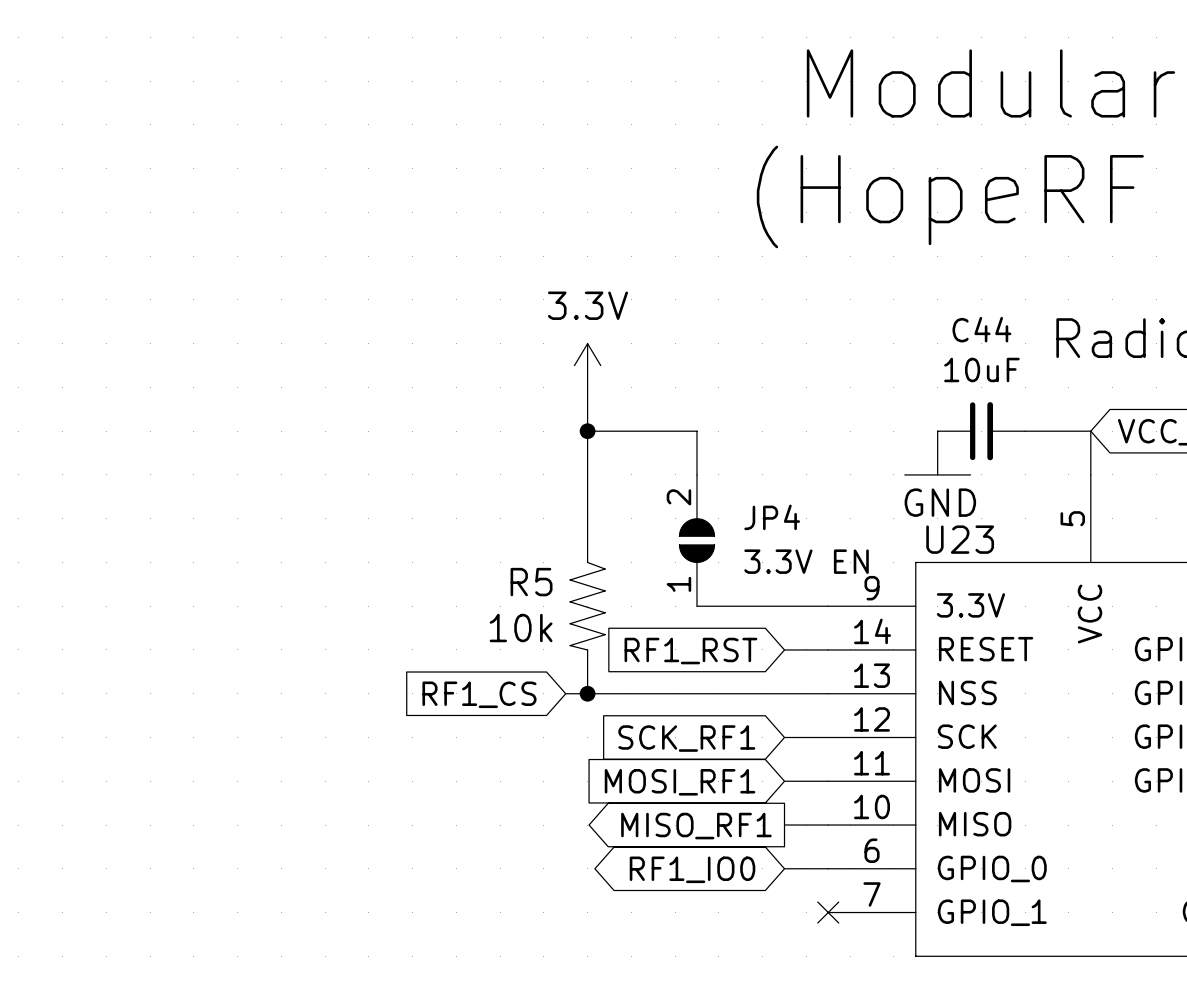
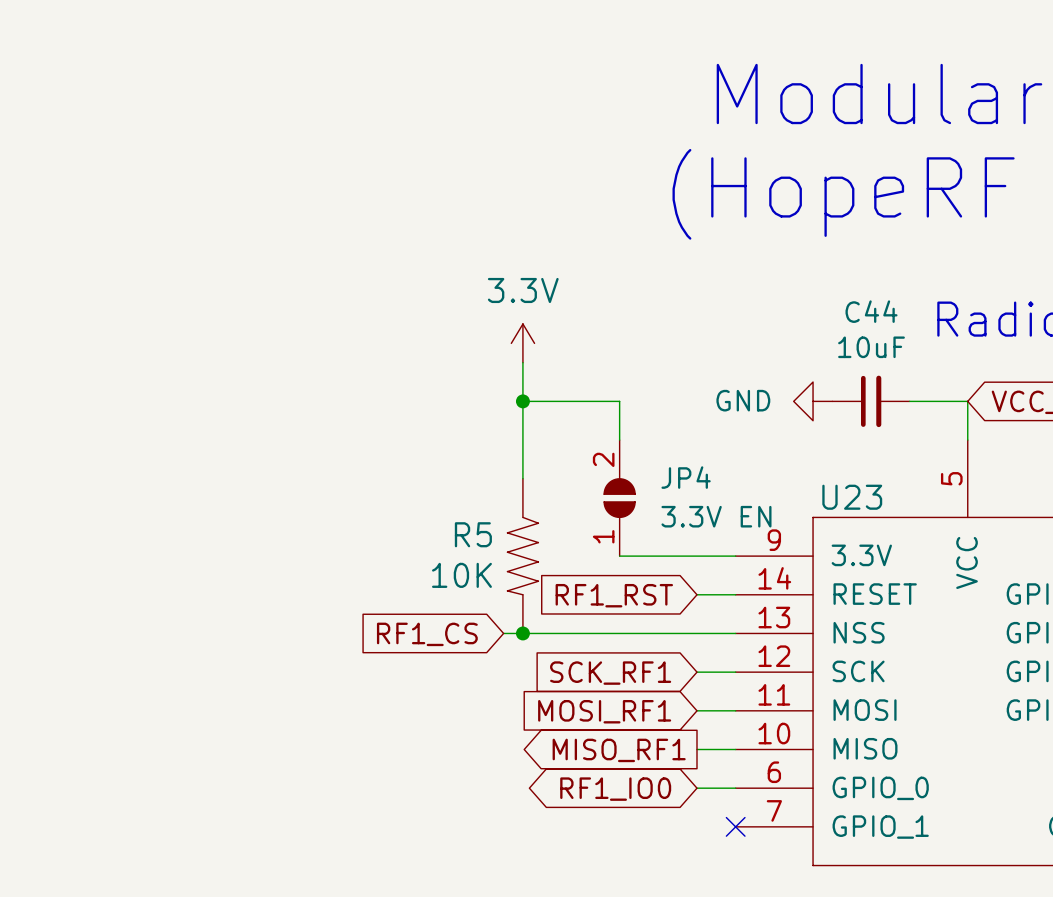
power symbol: none -> GND (813, 401)
power symbol: GND (937, 453) -> none
R5 value: 10k (521, 628) -> 10K (461, 575)

